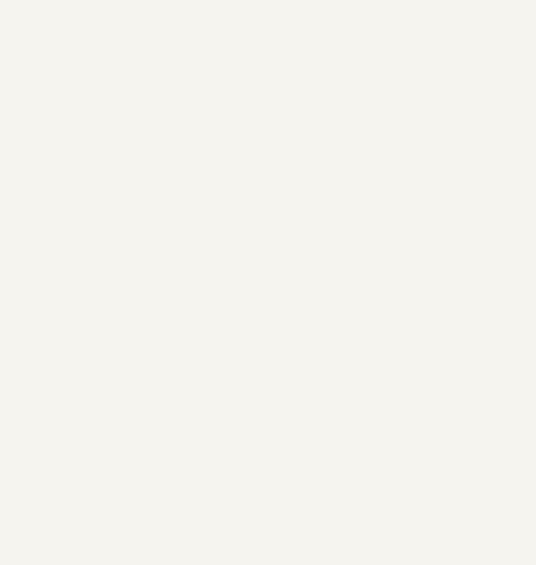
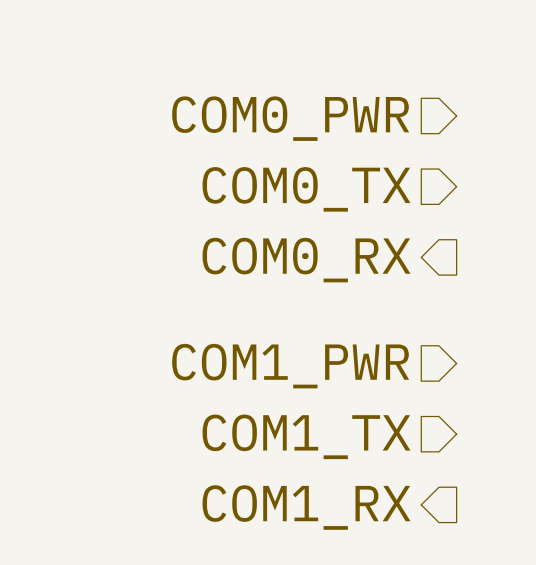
hierarchical label: none -> COM0_PWR (290, 118)
hierarchical label: none -> COM0_TX (306, 189)
hierarchical label: none -> COM0_RX (306, 260)
hierarchical label: none -> COM1_PWR (290, 366)
hierarchical label: none -> COM1_TX (306, 436)
hierarchical label: none -> COM1_RX (306, 507)

